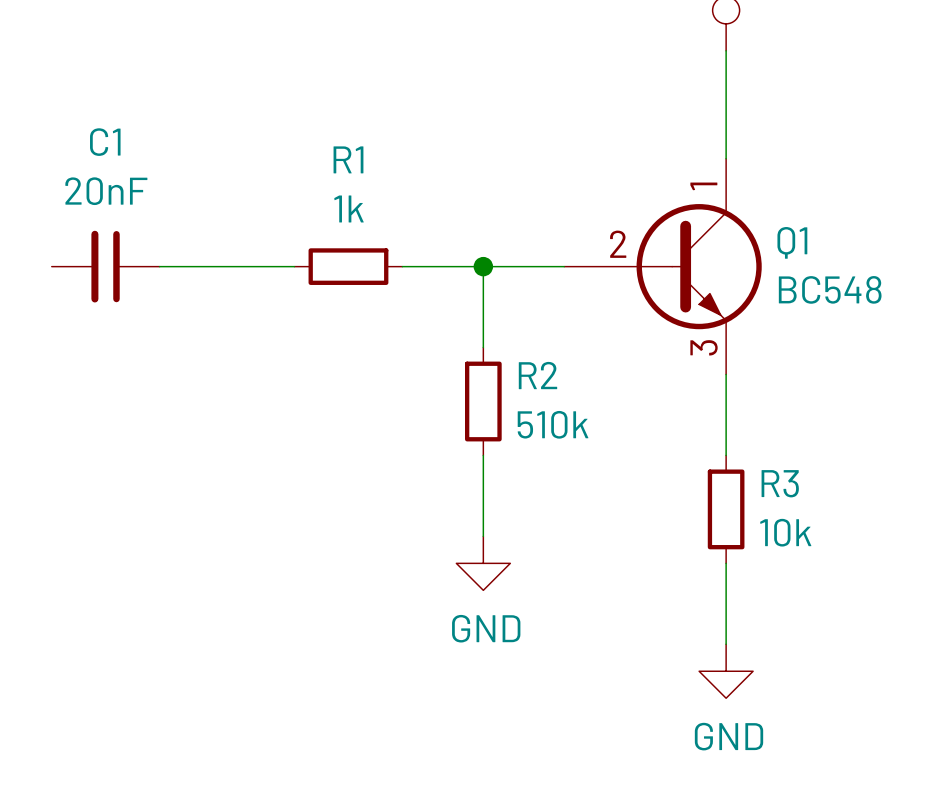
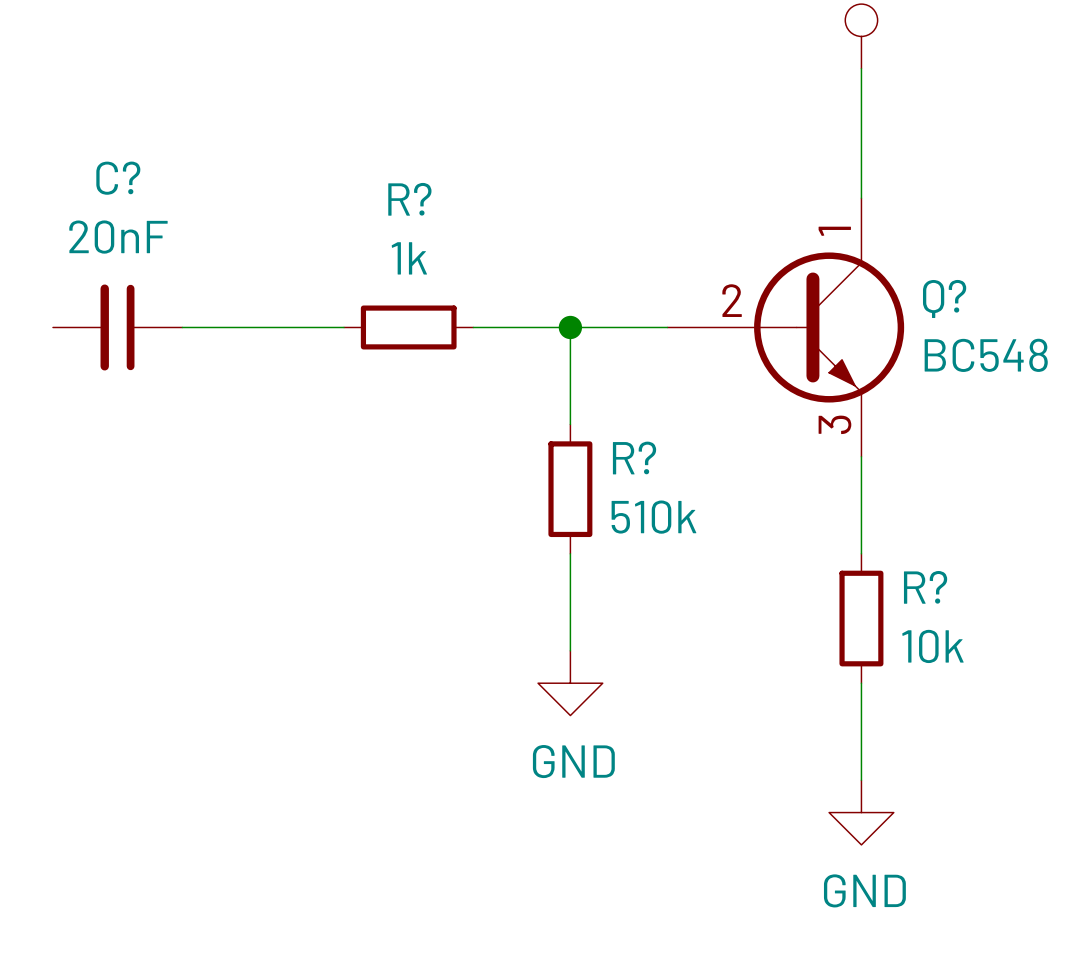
C1 name: C1 (105, 142) -> C? (118, 178)
R1 name: R1 (348, 159) -> R? (409, 199)
Q1 name: Q1 (792, 242) -> Q? (944, 298)
R2 name: R2 (537, 375) -> R? (634, 458)
R3 name: R3 (780, 483) -> R? (925, 587)

